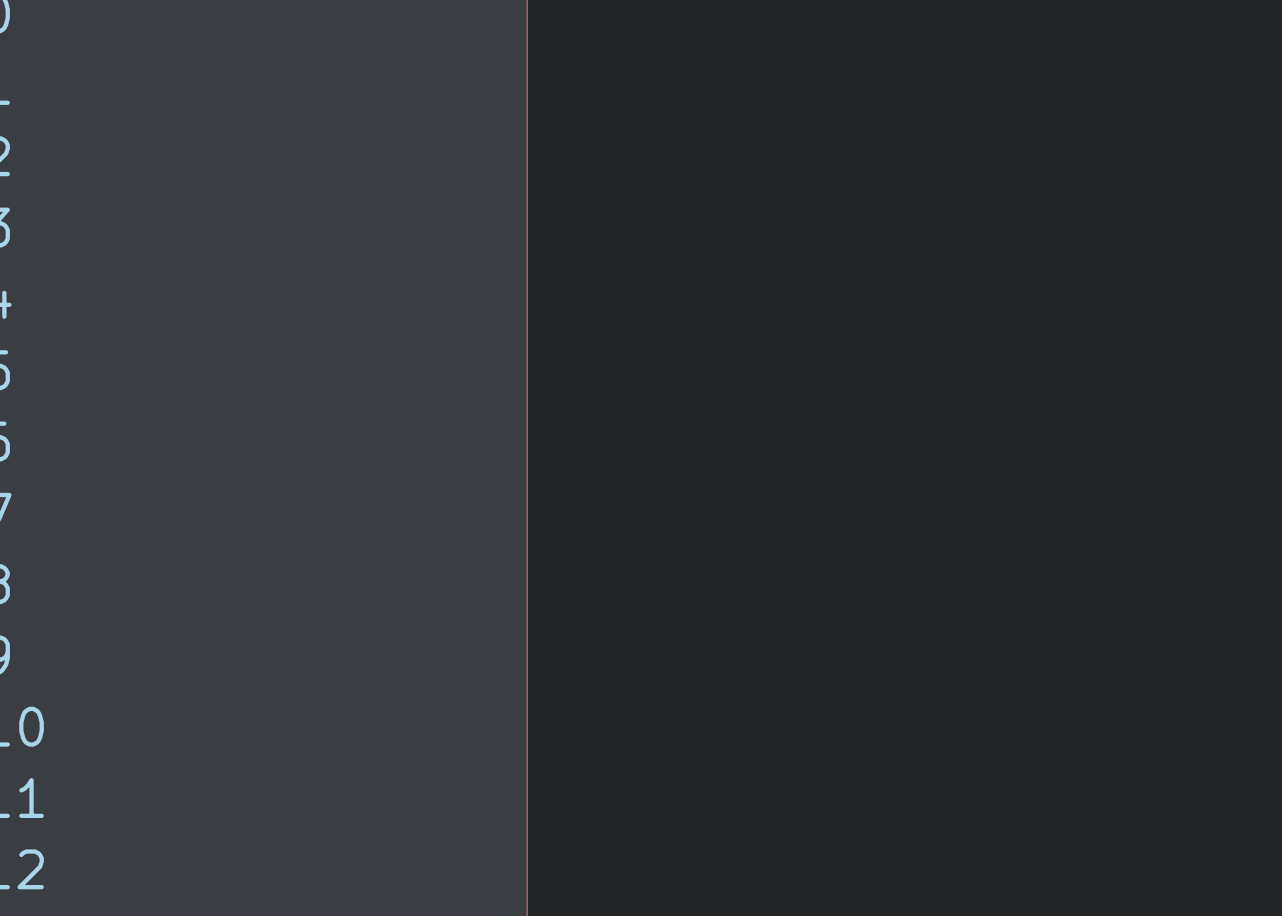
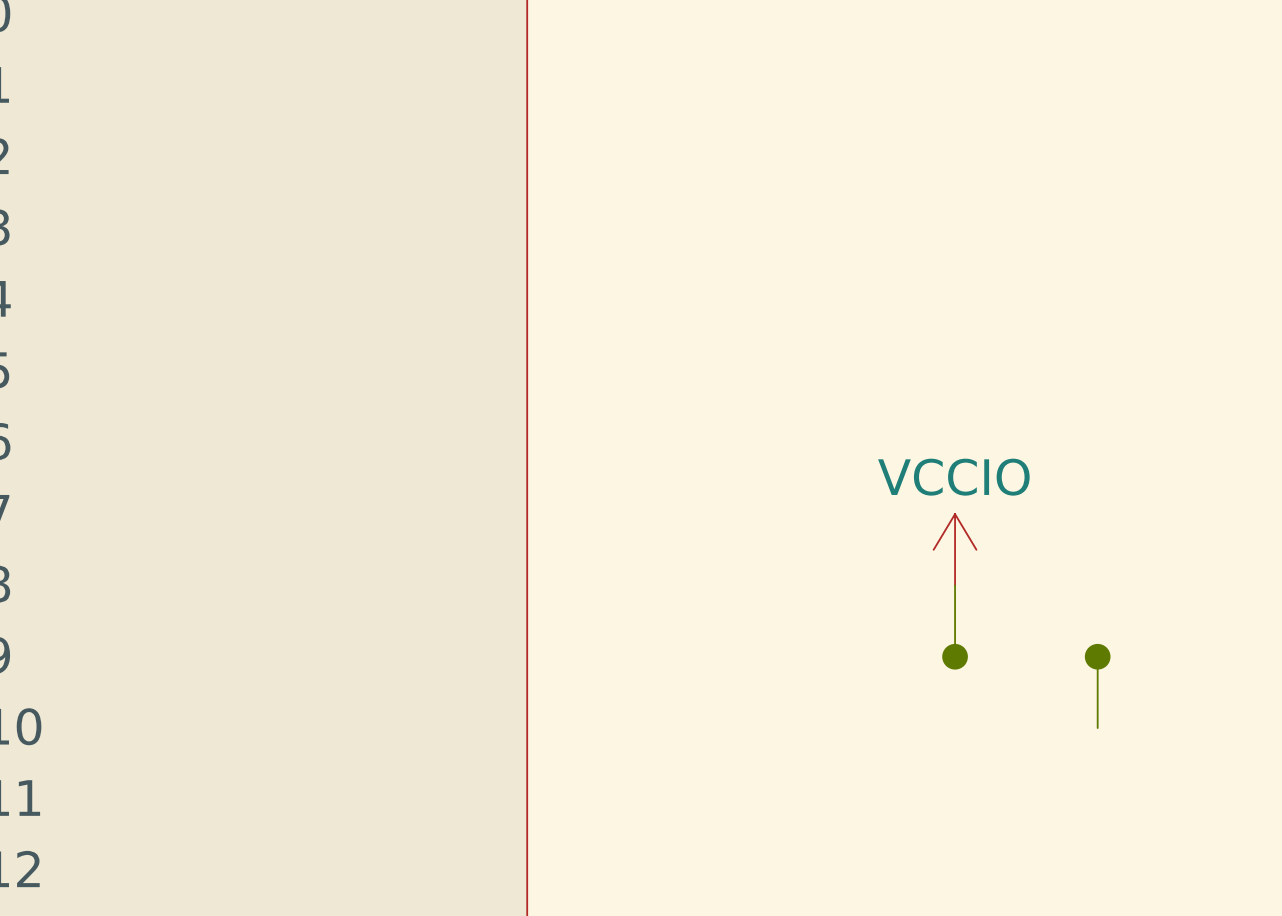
power symbol: none -> VCCIO (955, 549)
wire: none -> (955, 585) (955, 656)
junction: none -> (955, 656)
wire: none -> (1097, 656) (1097, 728)
junction: none -> (1097, 656)

